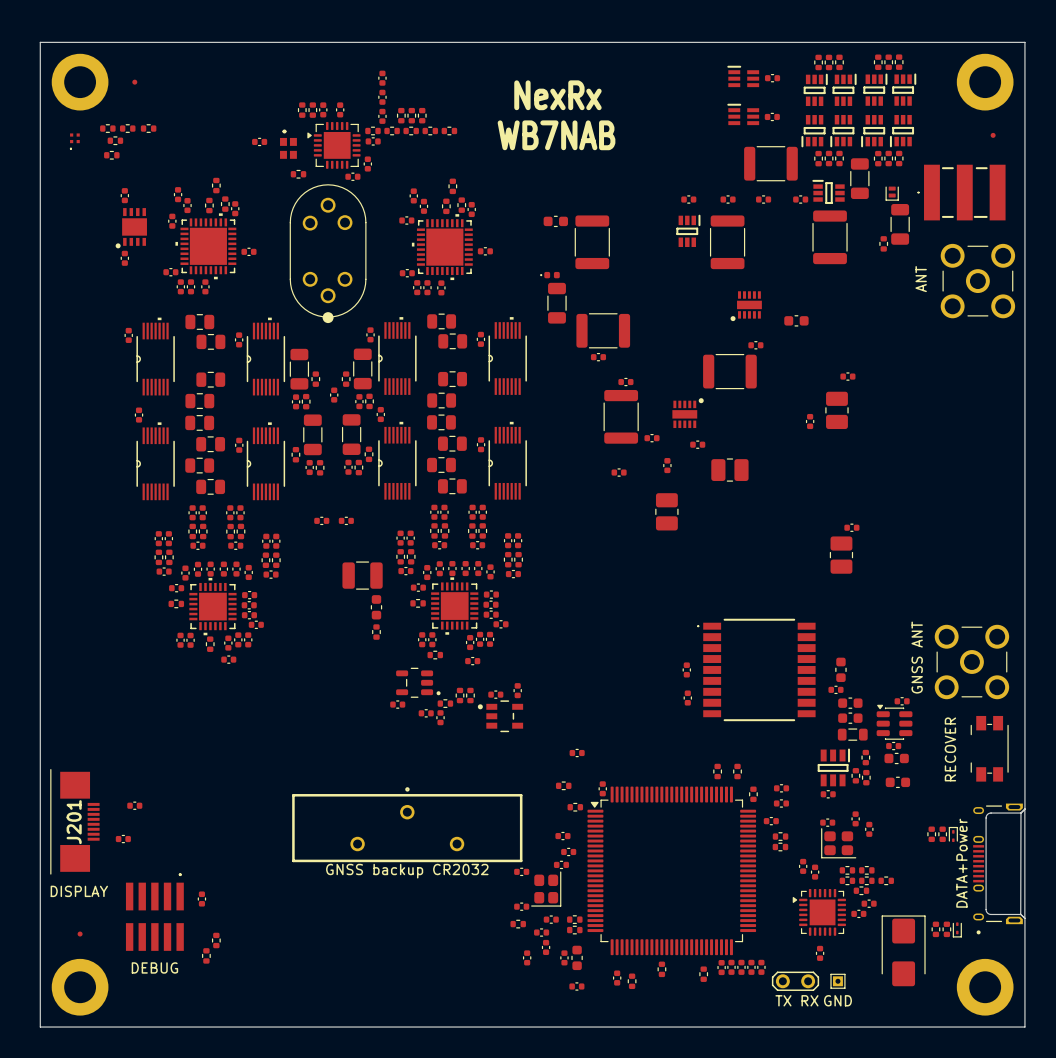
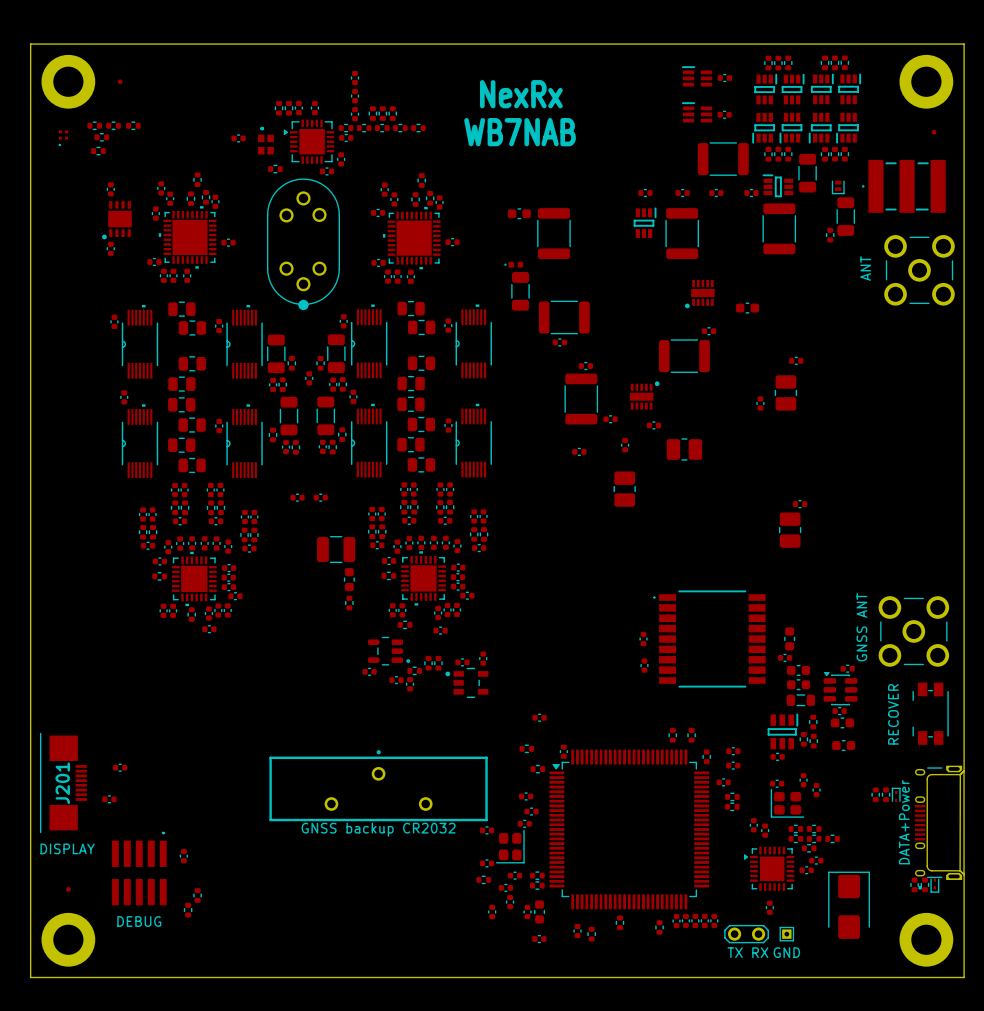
part: (935, 929) -> none
part: (946, 929) -> none
part position: (957, 929) -> (934, 885)
part: none -> (914, 884)
part: none -> (924, 884)

